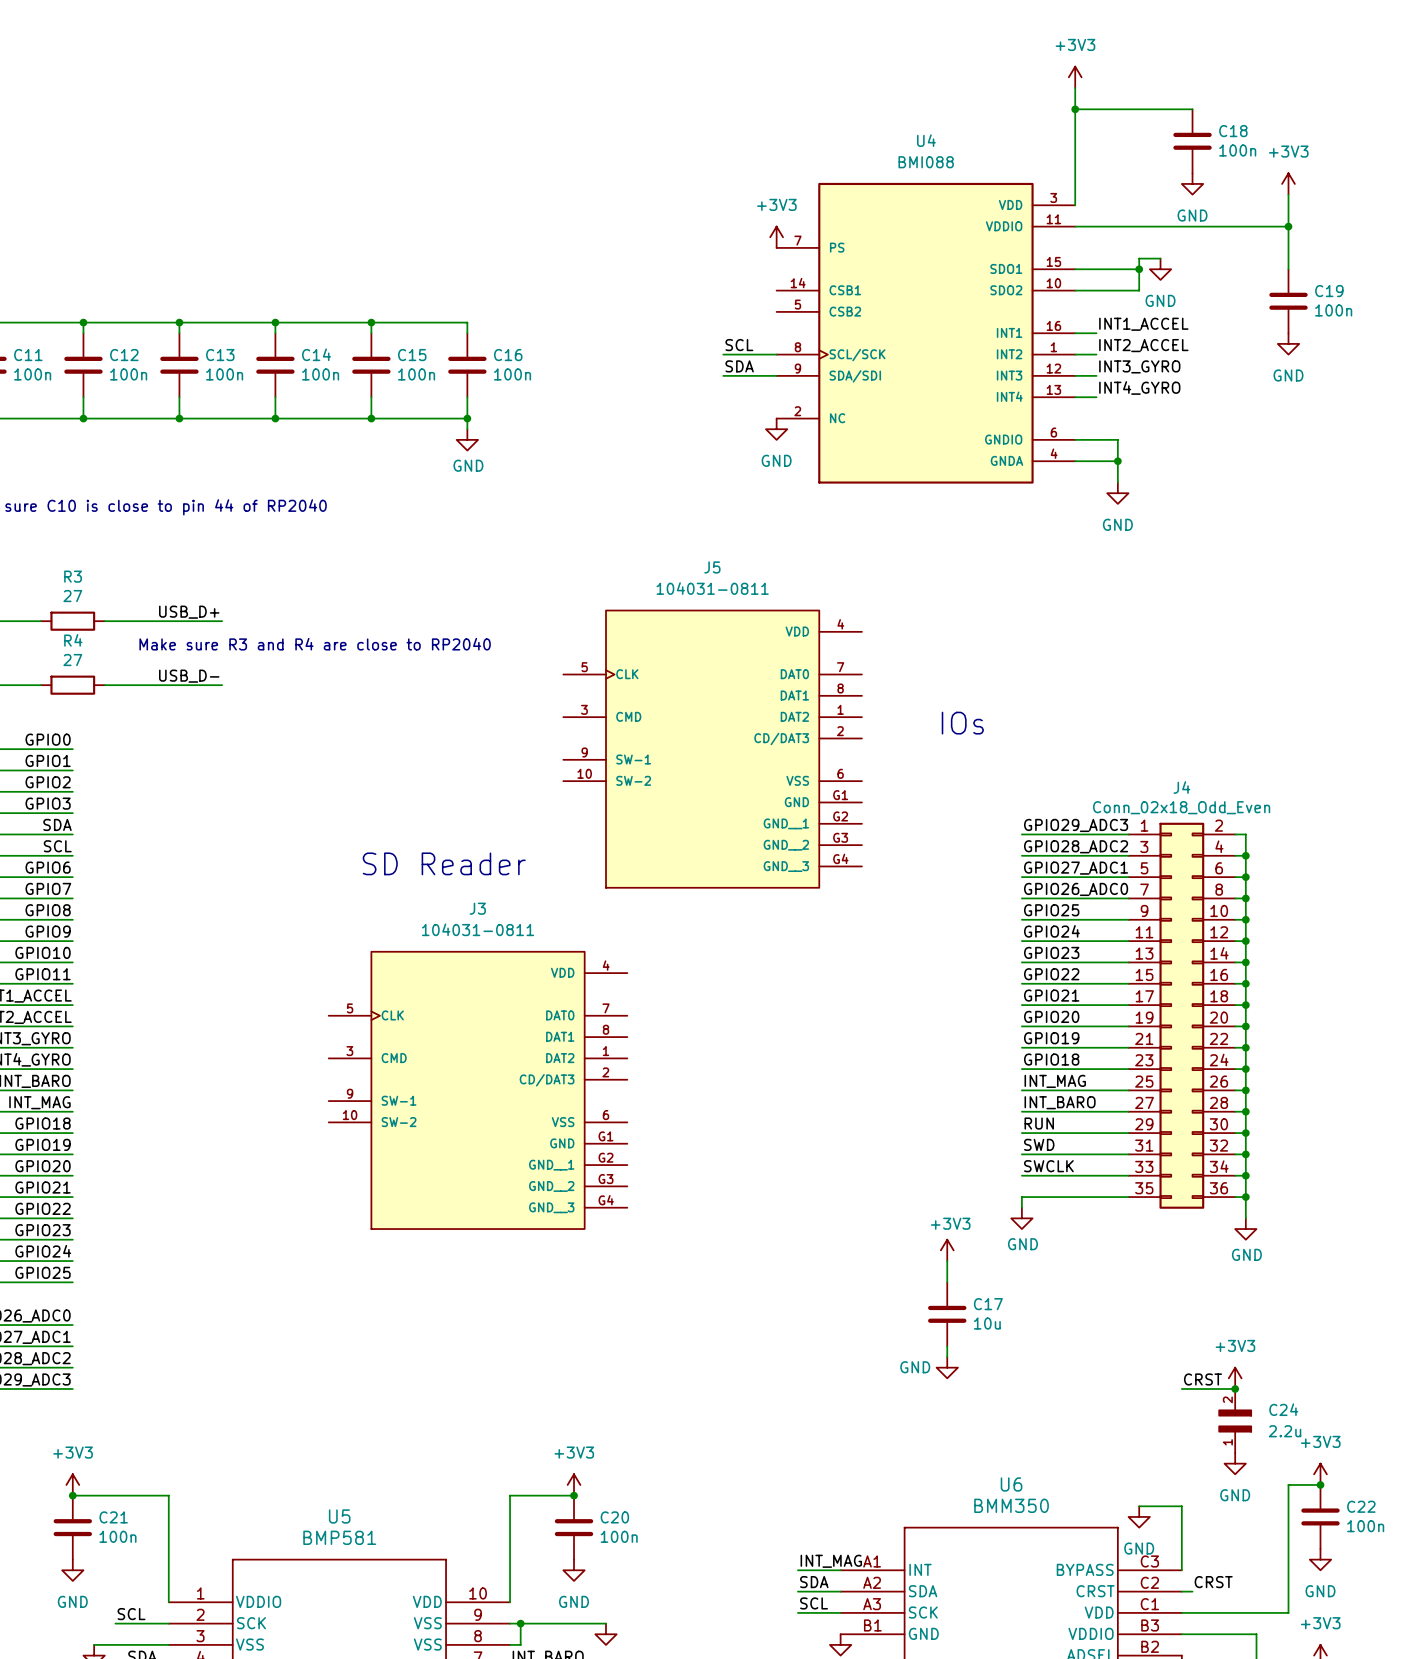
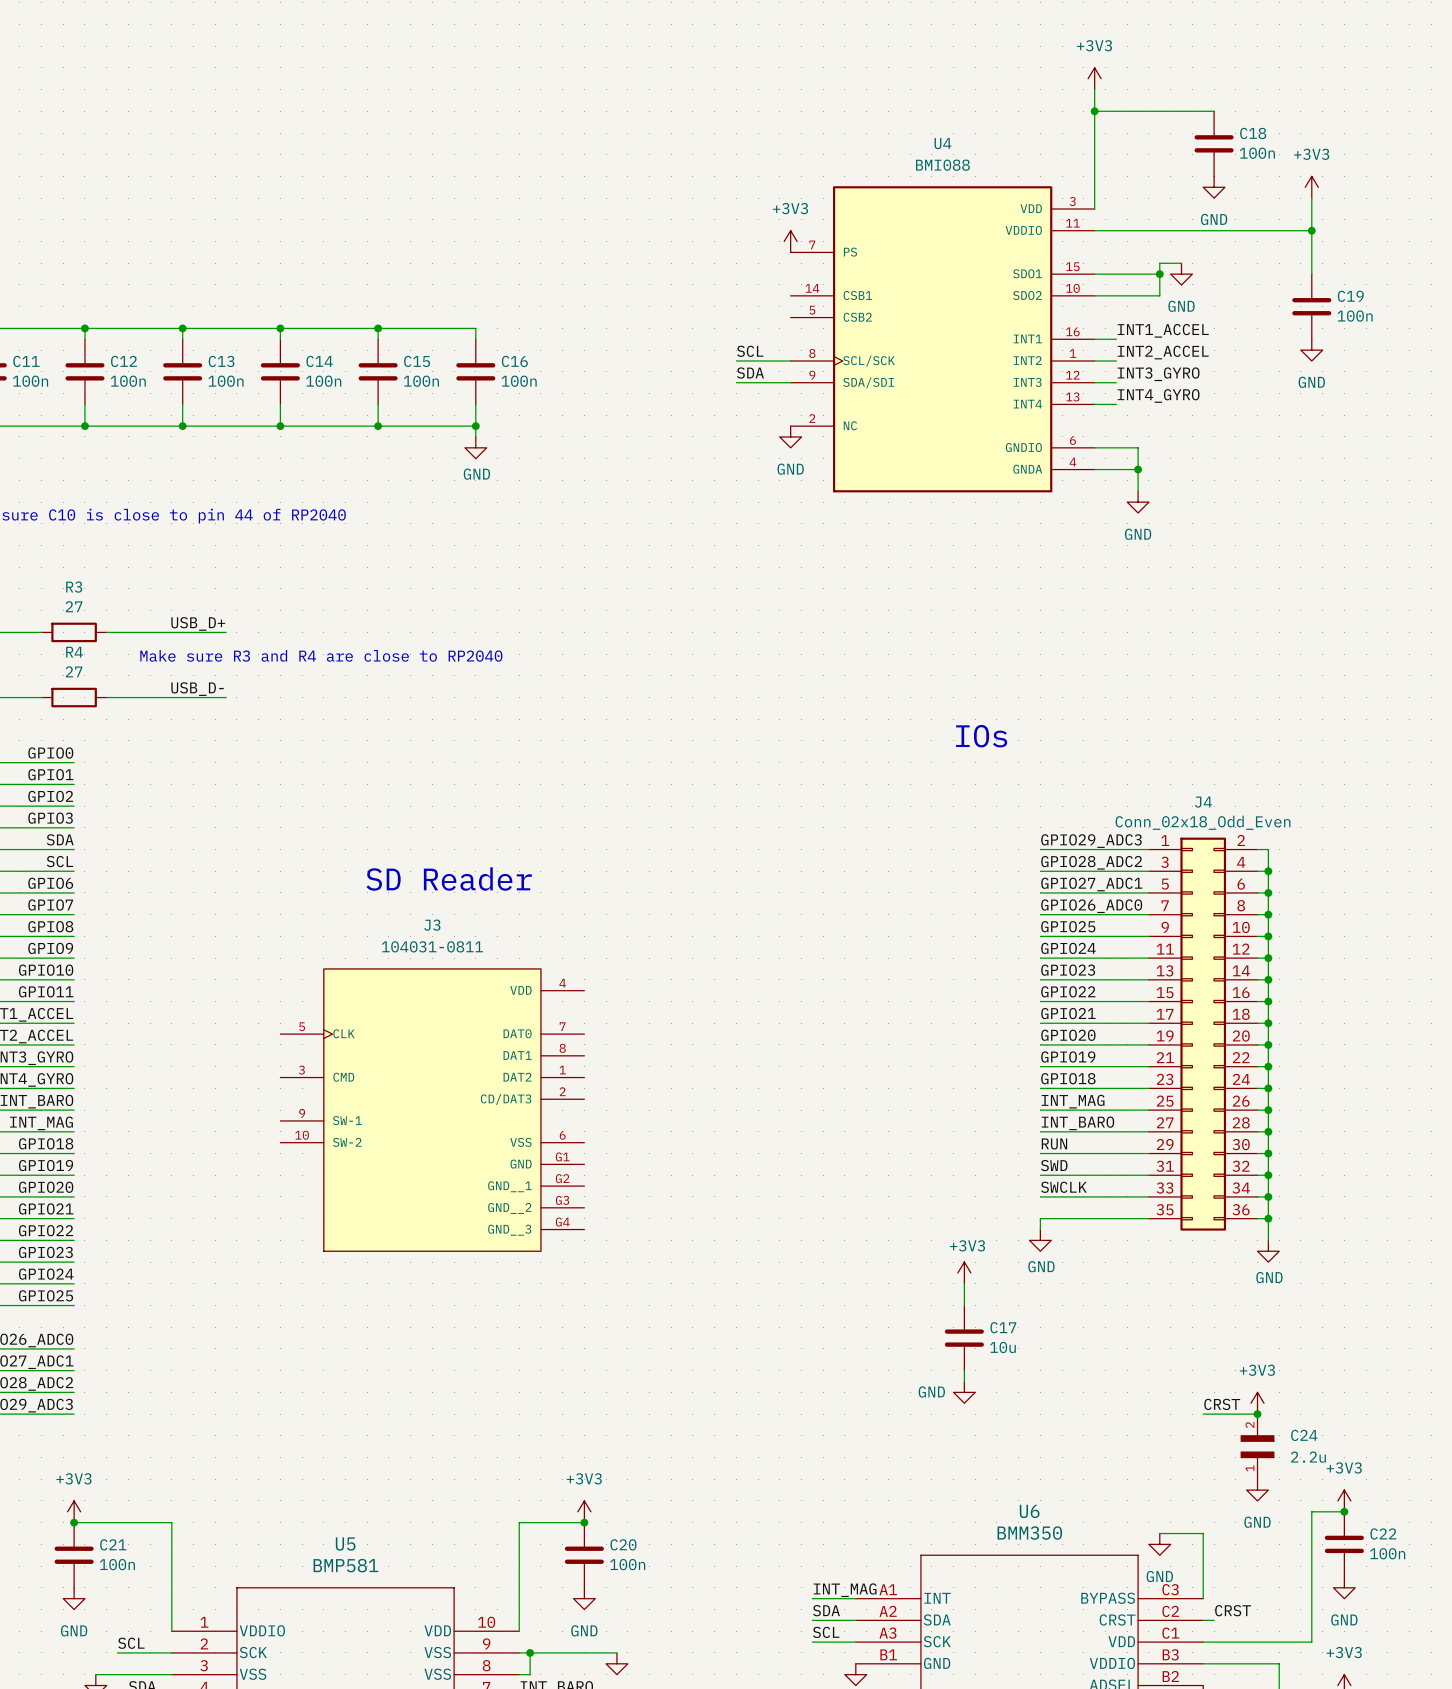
J5: 104031-0811 (712, 749) -> none
J3 position: (478, 1090) -> (432, 1110)

